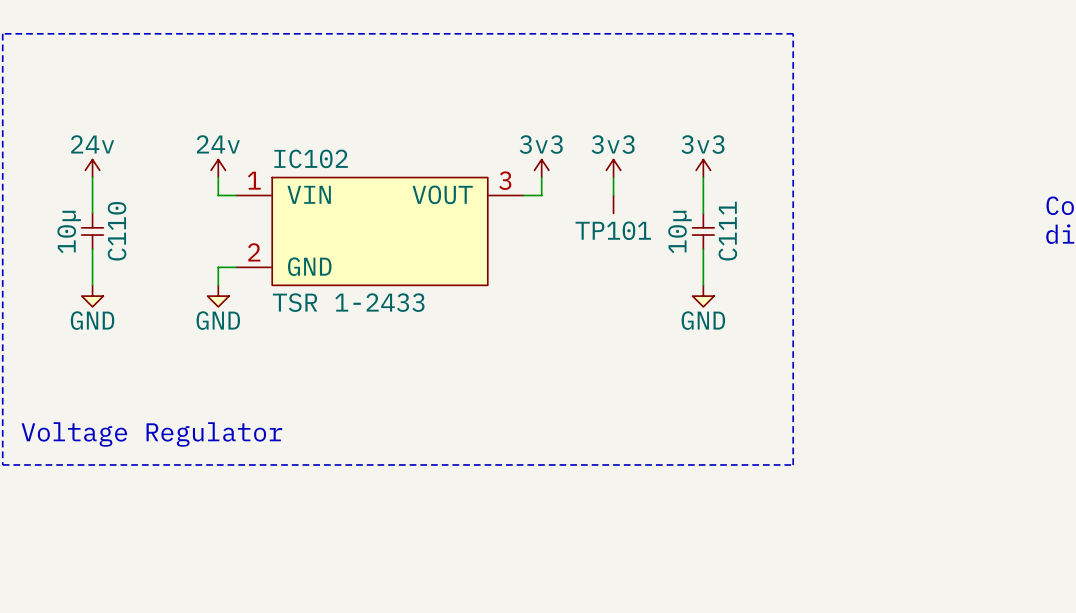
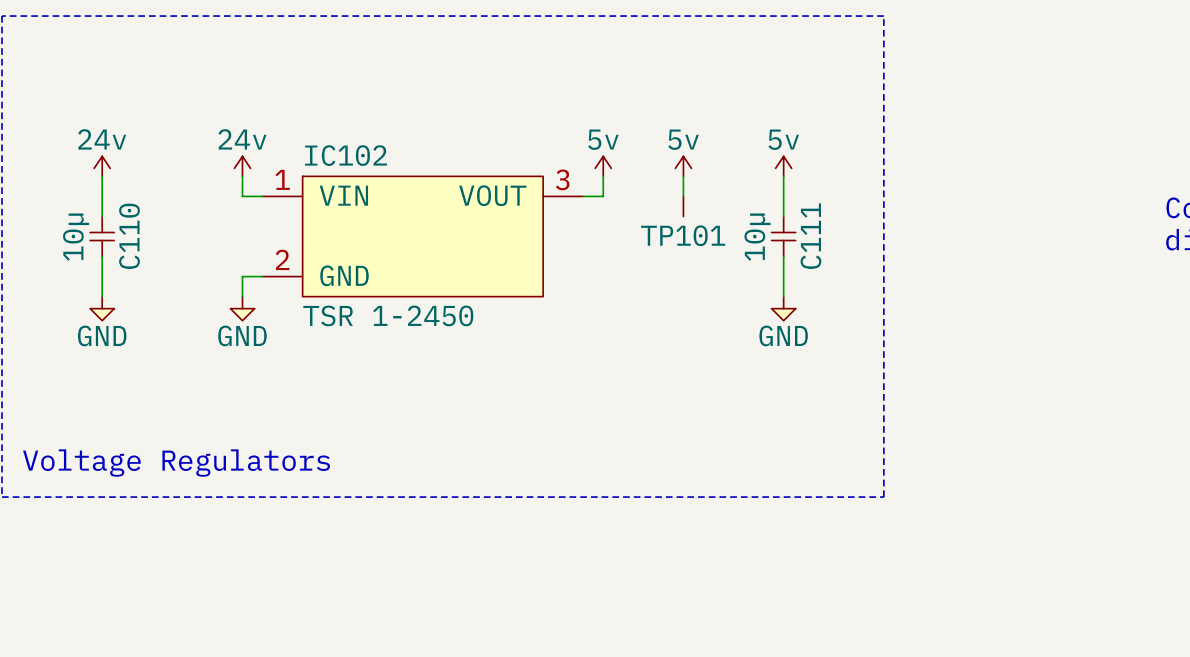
power symbol: 3v3 (541, 168) -> 5v (603, 166)
power symbol: 3v3 (613, 168) -> 5v (683, 166)
power symbol: 3v3 (703, 168) -> 5v (783, 166)
IC102 value: TSR 1-2433 (348, 302) -> TSR 1-2450 (388, 315)
text: Voltage Regulator (151, 434) -> Voltage Regulators (176, 463)

